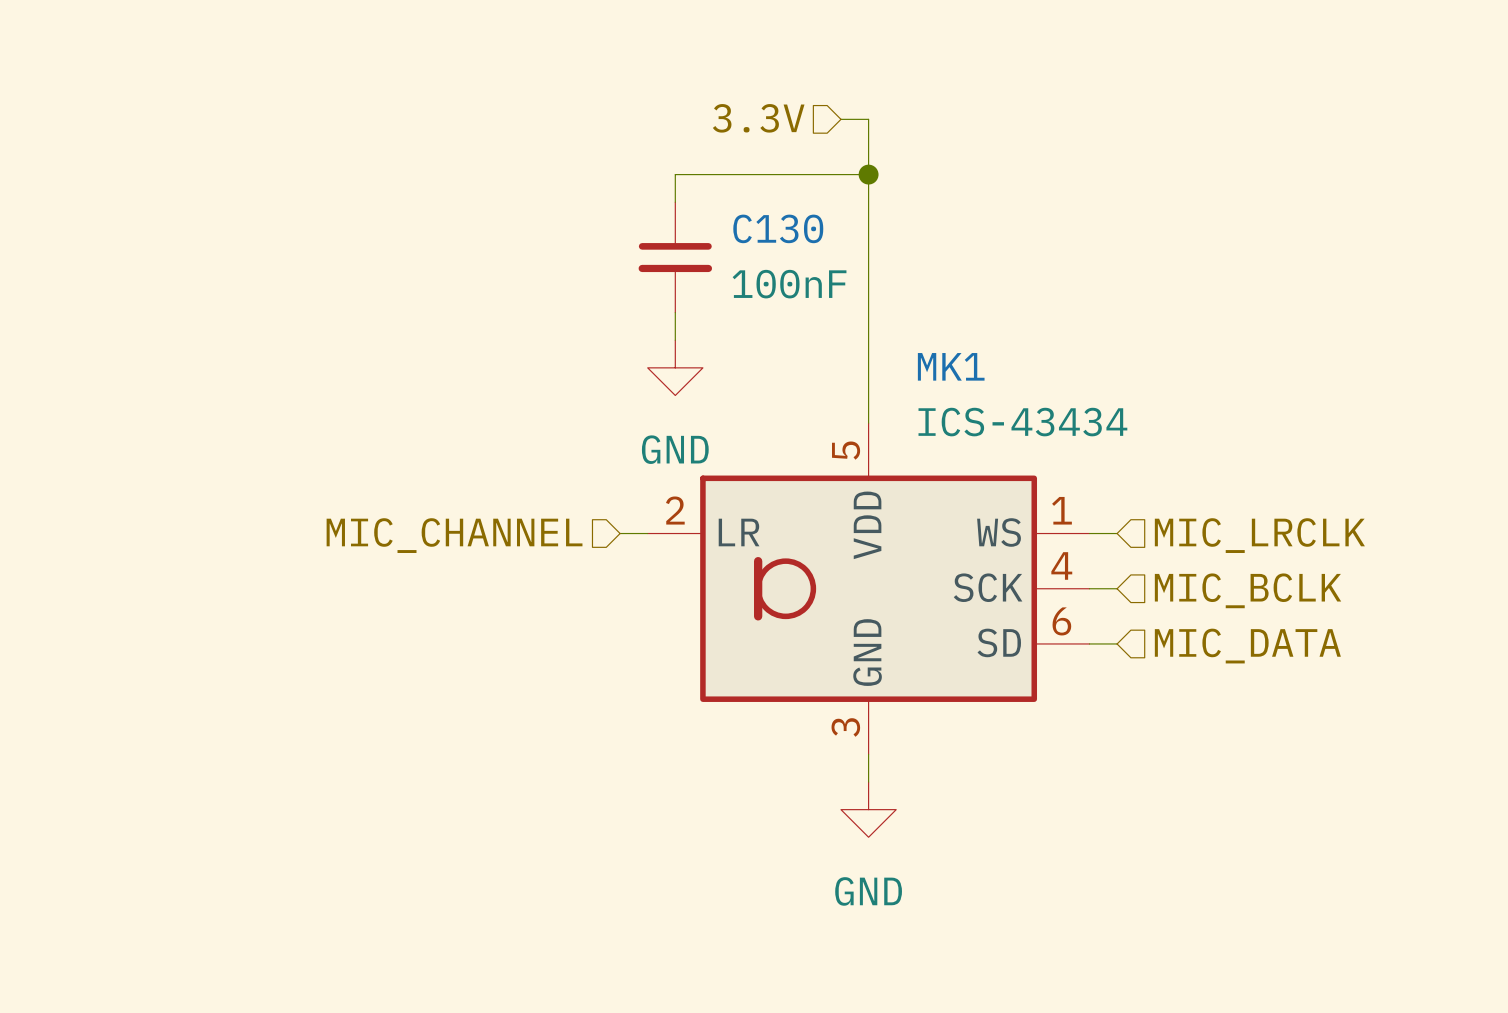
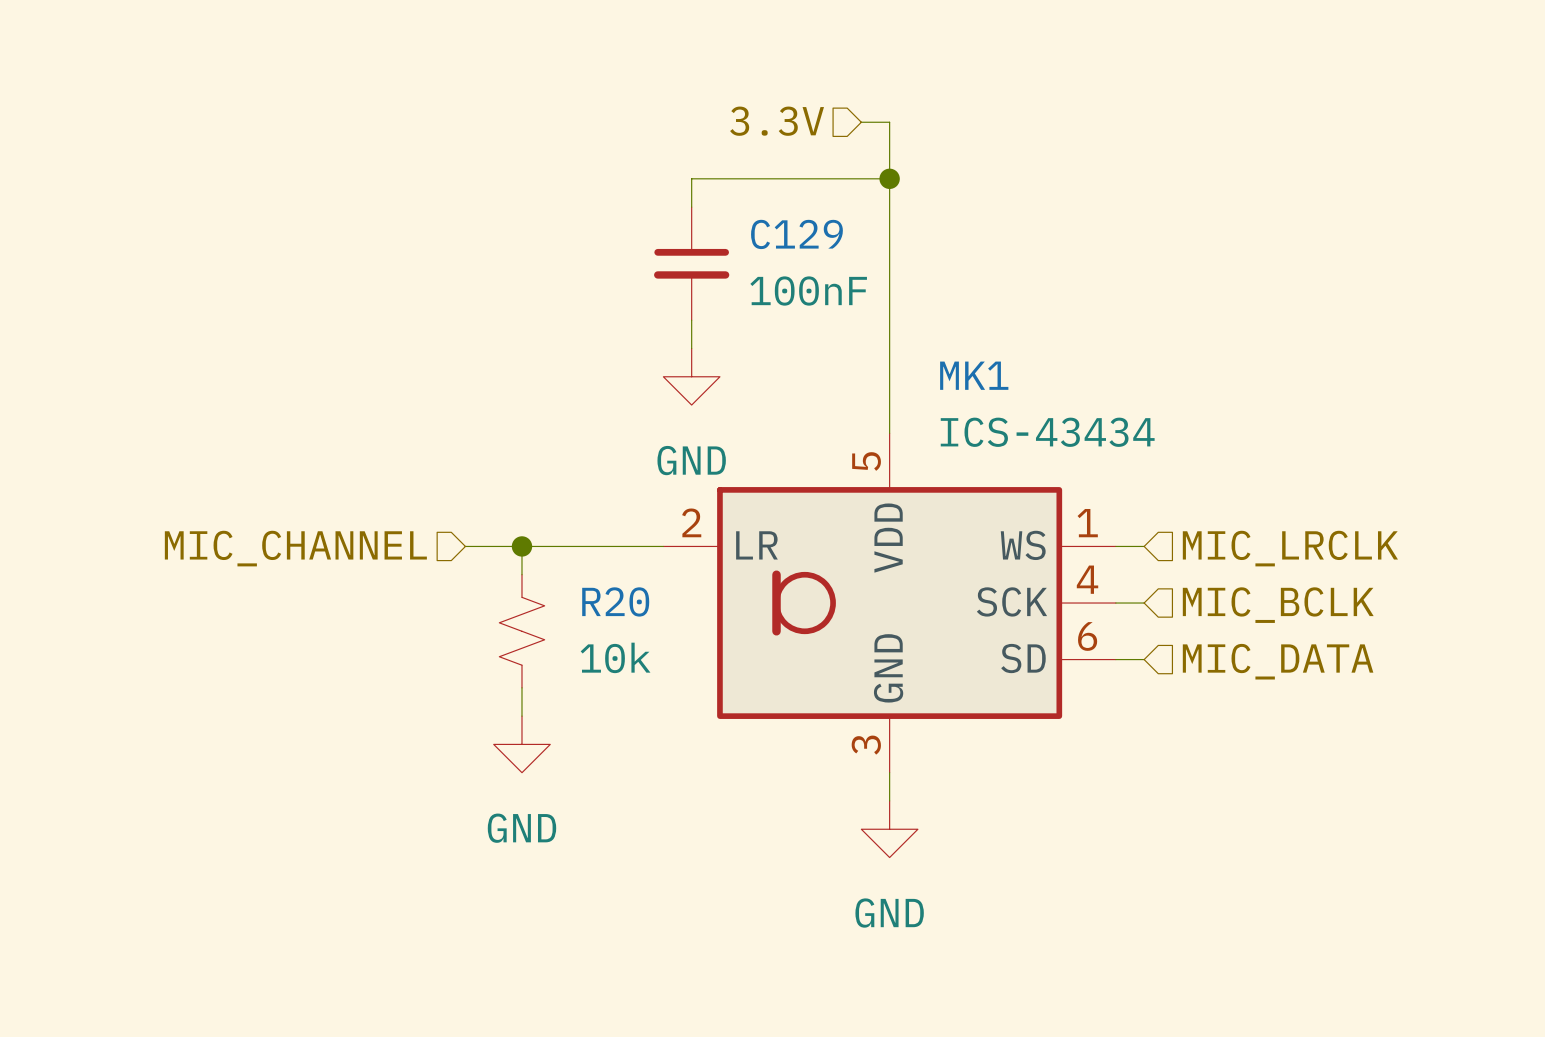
C130 name: C130 (778, 228) -> C129 (796, 234)
wire: none -> (465, 546) (635, 546)
wire: none -> (521, 546) (521, 574)
junction: none -> (521, 546)
hierarchical label position: MIC_CHANNEL (454, 535) -> MIC_CHANNEL (295, 548)
R20: none -> 10k (521, 631)
wire: none -> (521, 687) (521, 716)
power symbol: none -> GND (521, 744)

